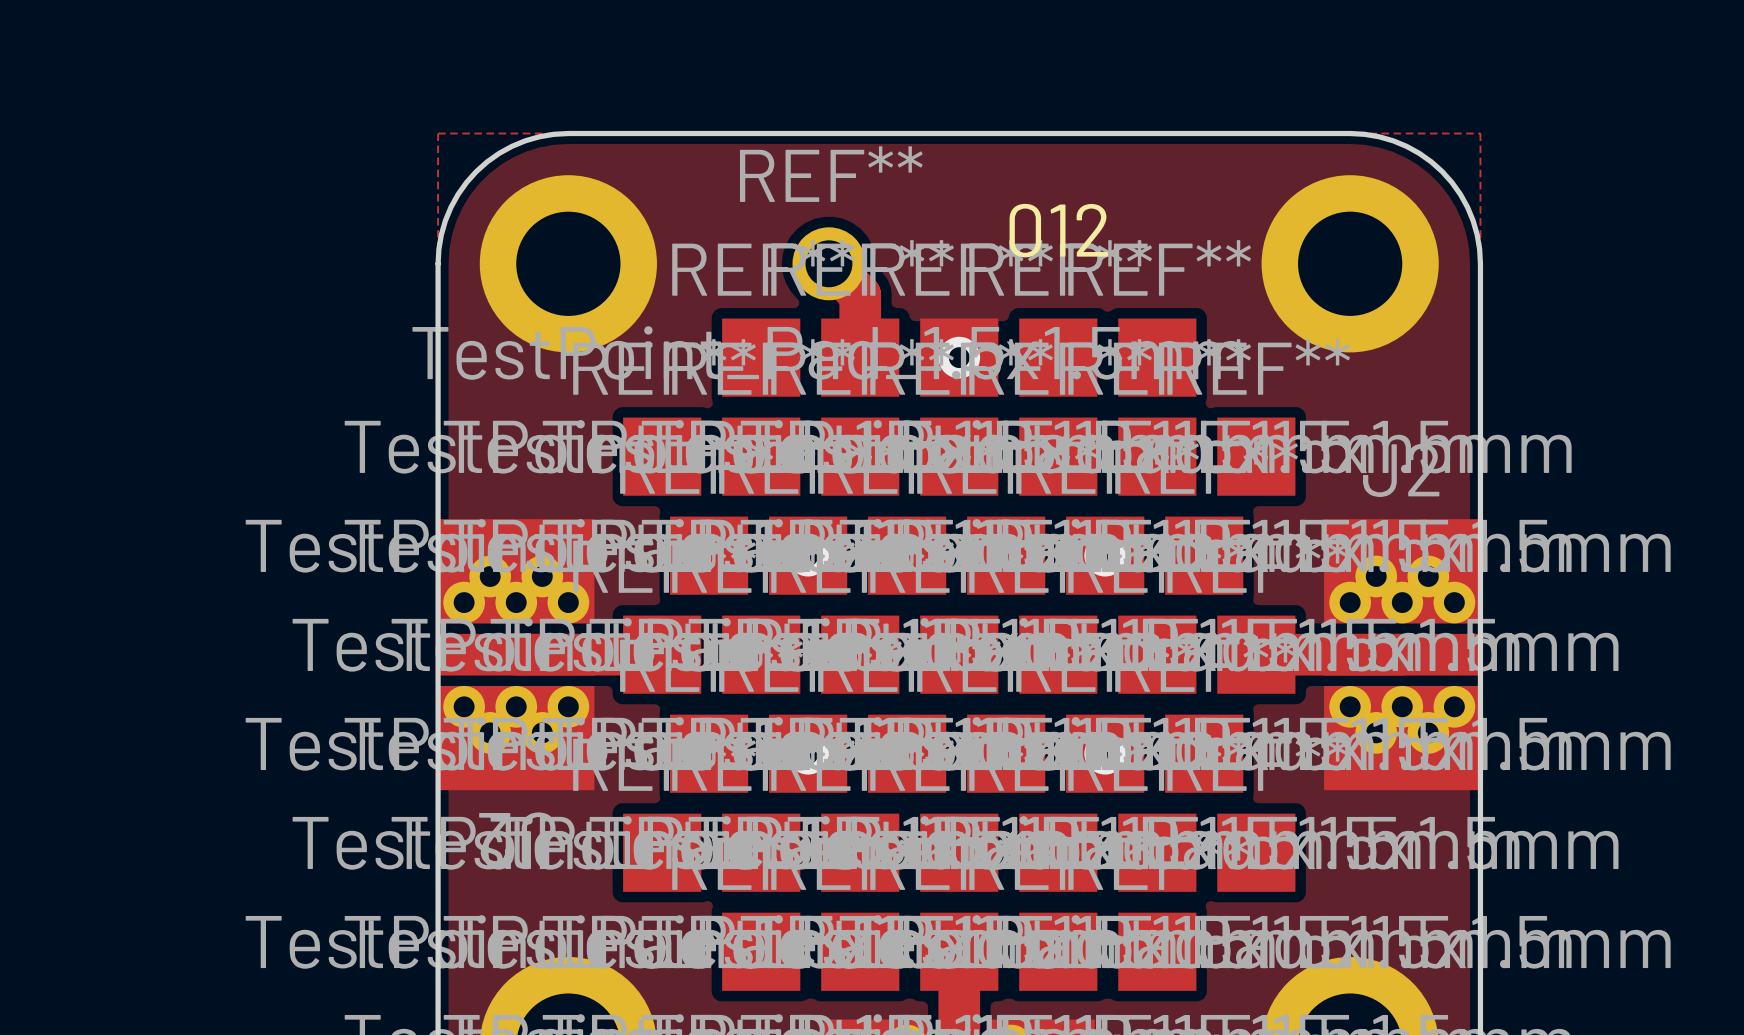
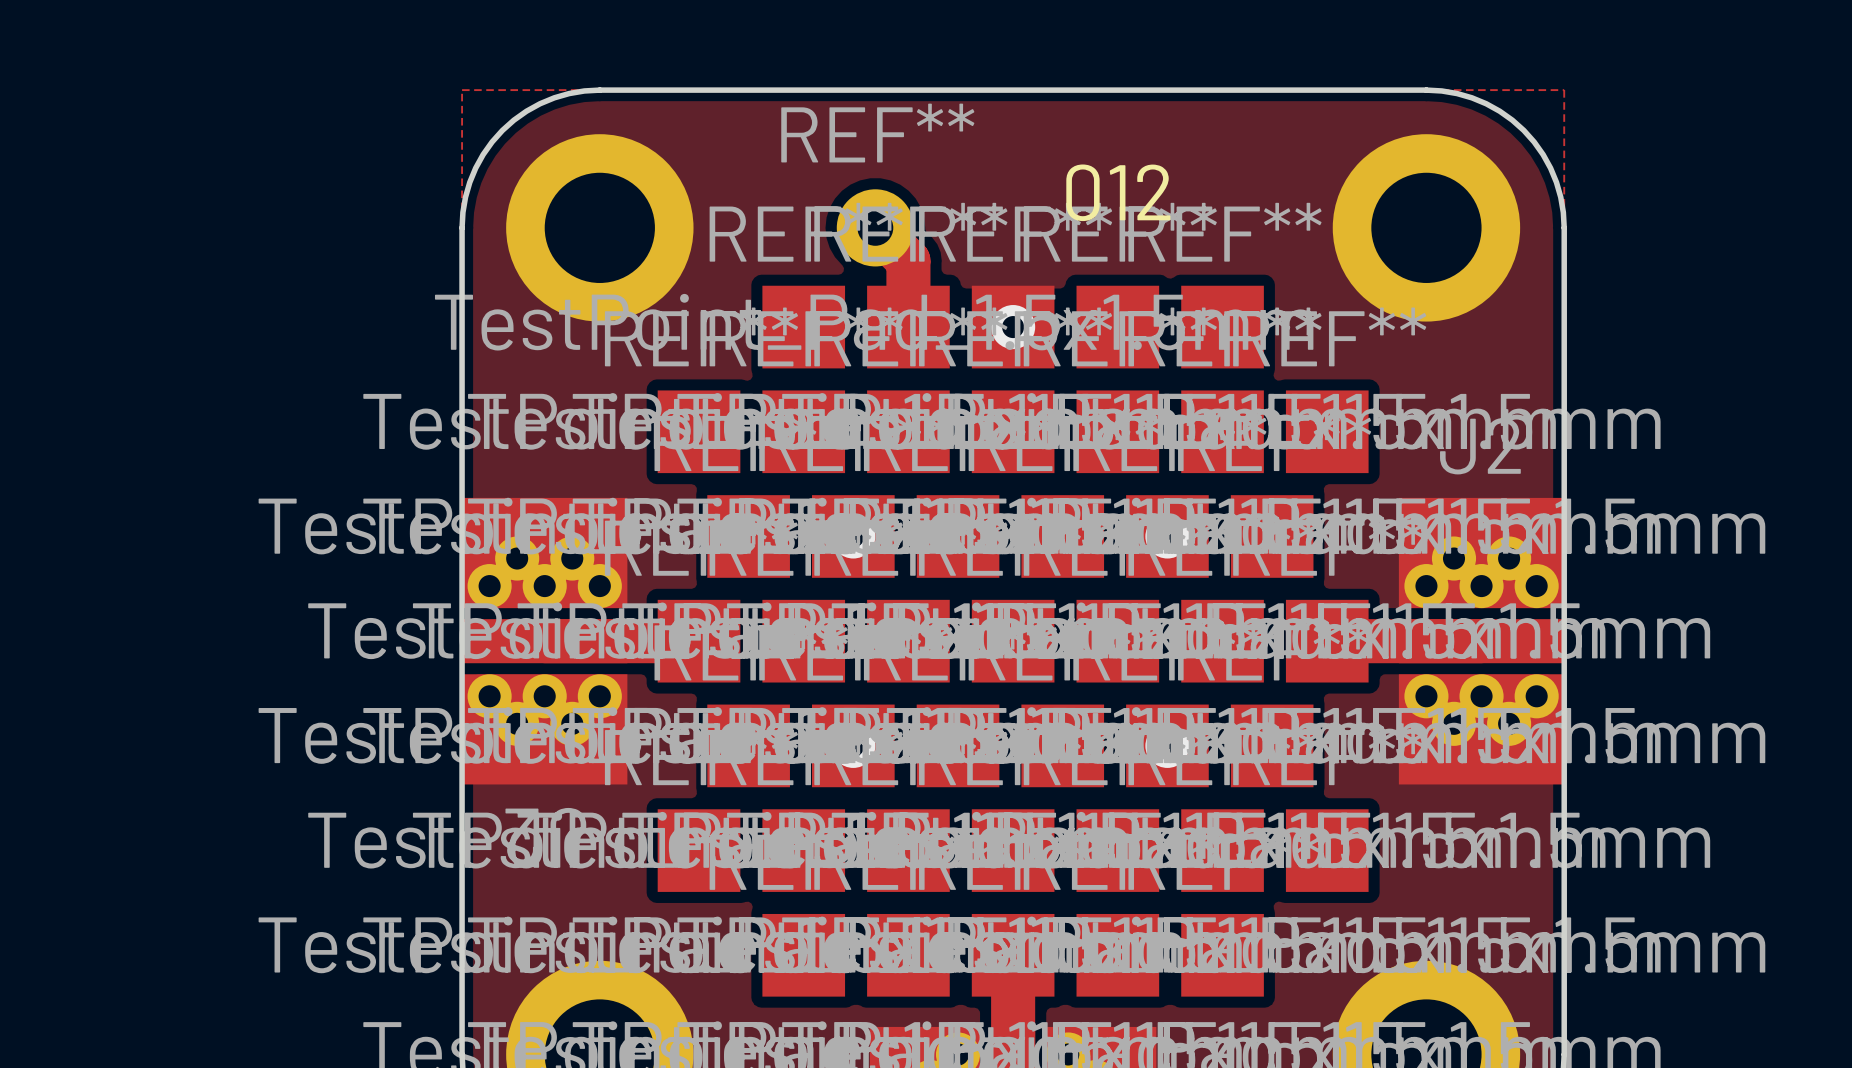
REF** footprint: [792, 227, 866, 301] -> [836, 189, 914, 267]

